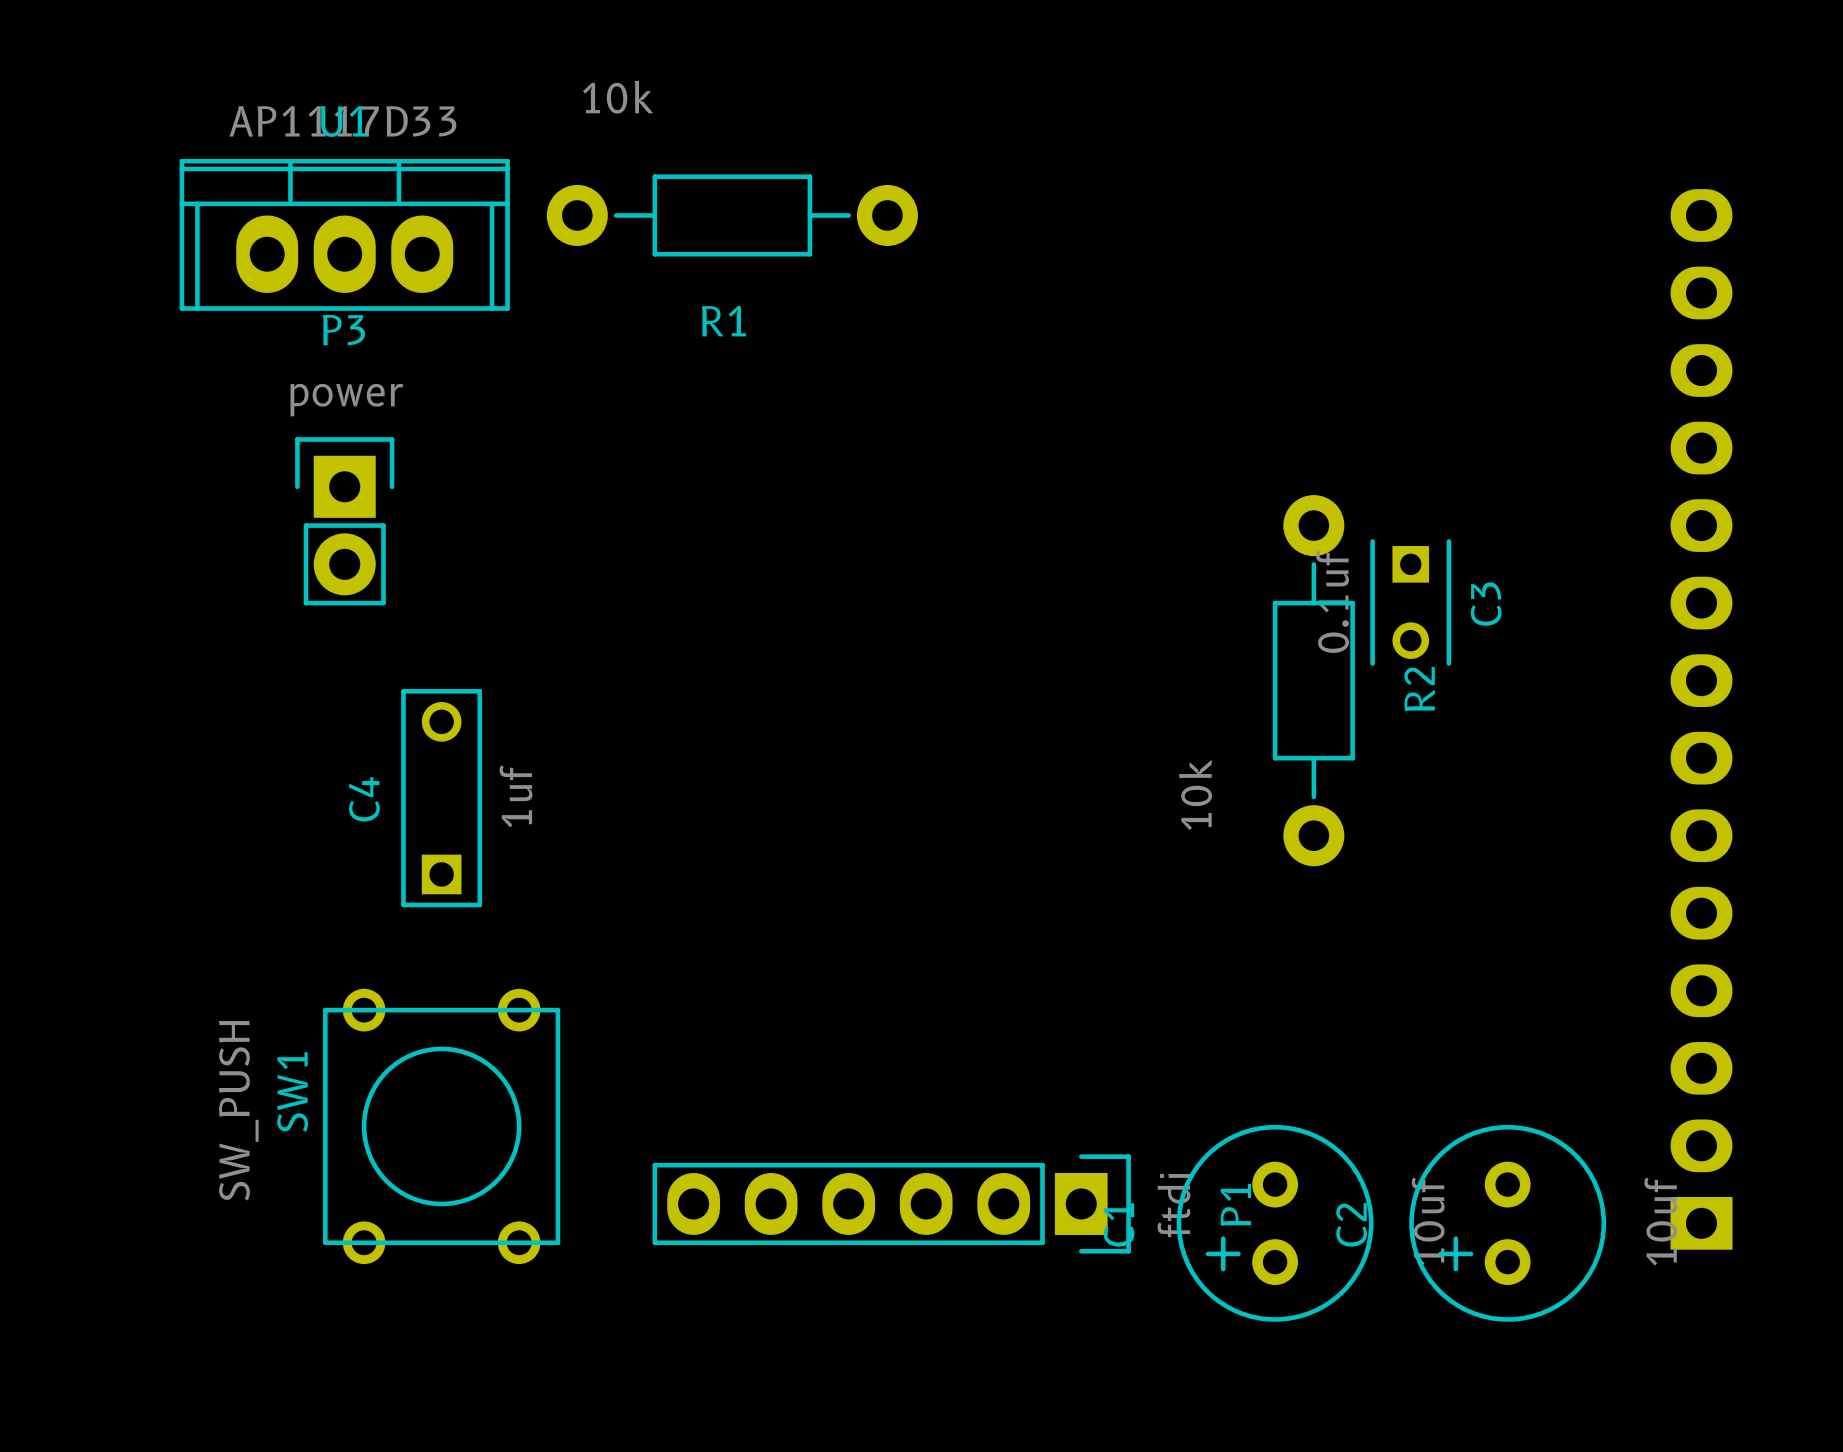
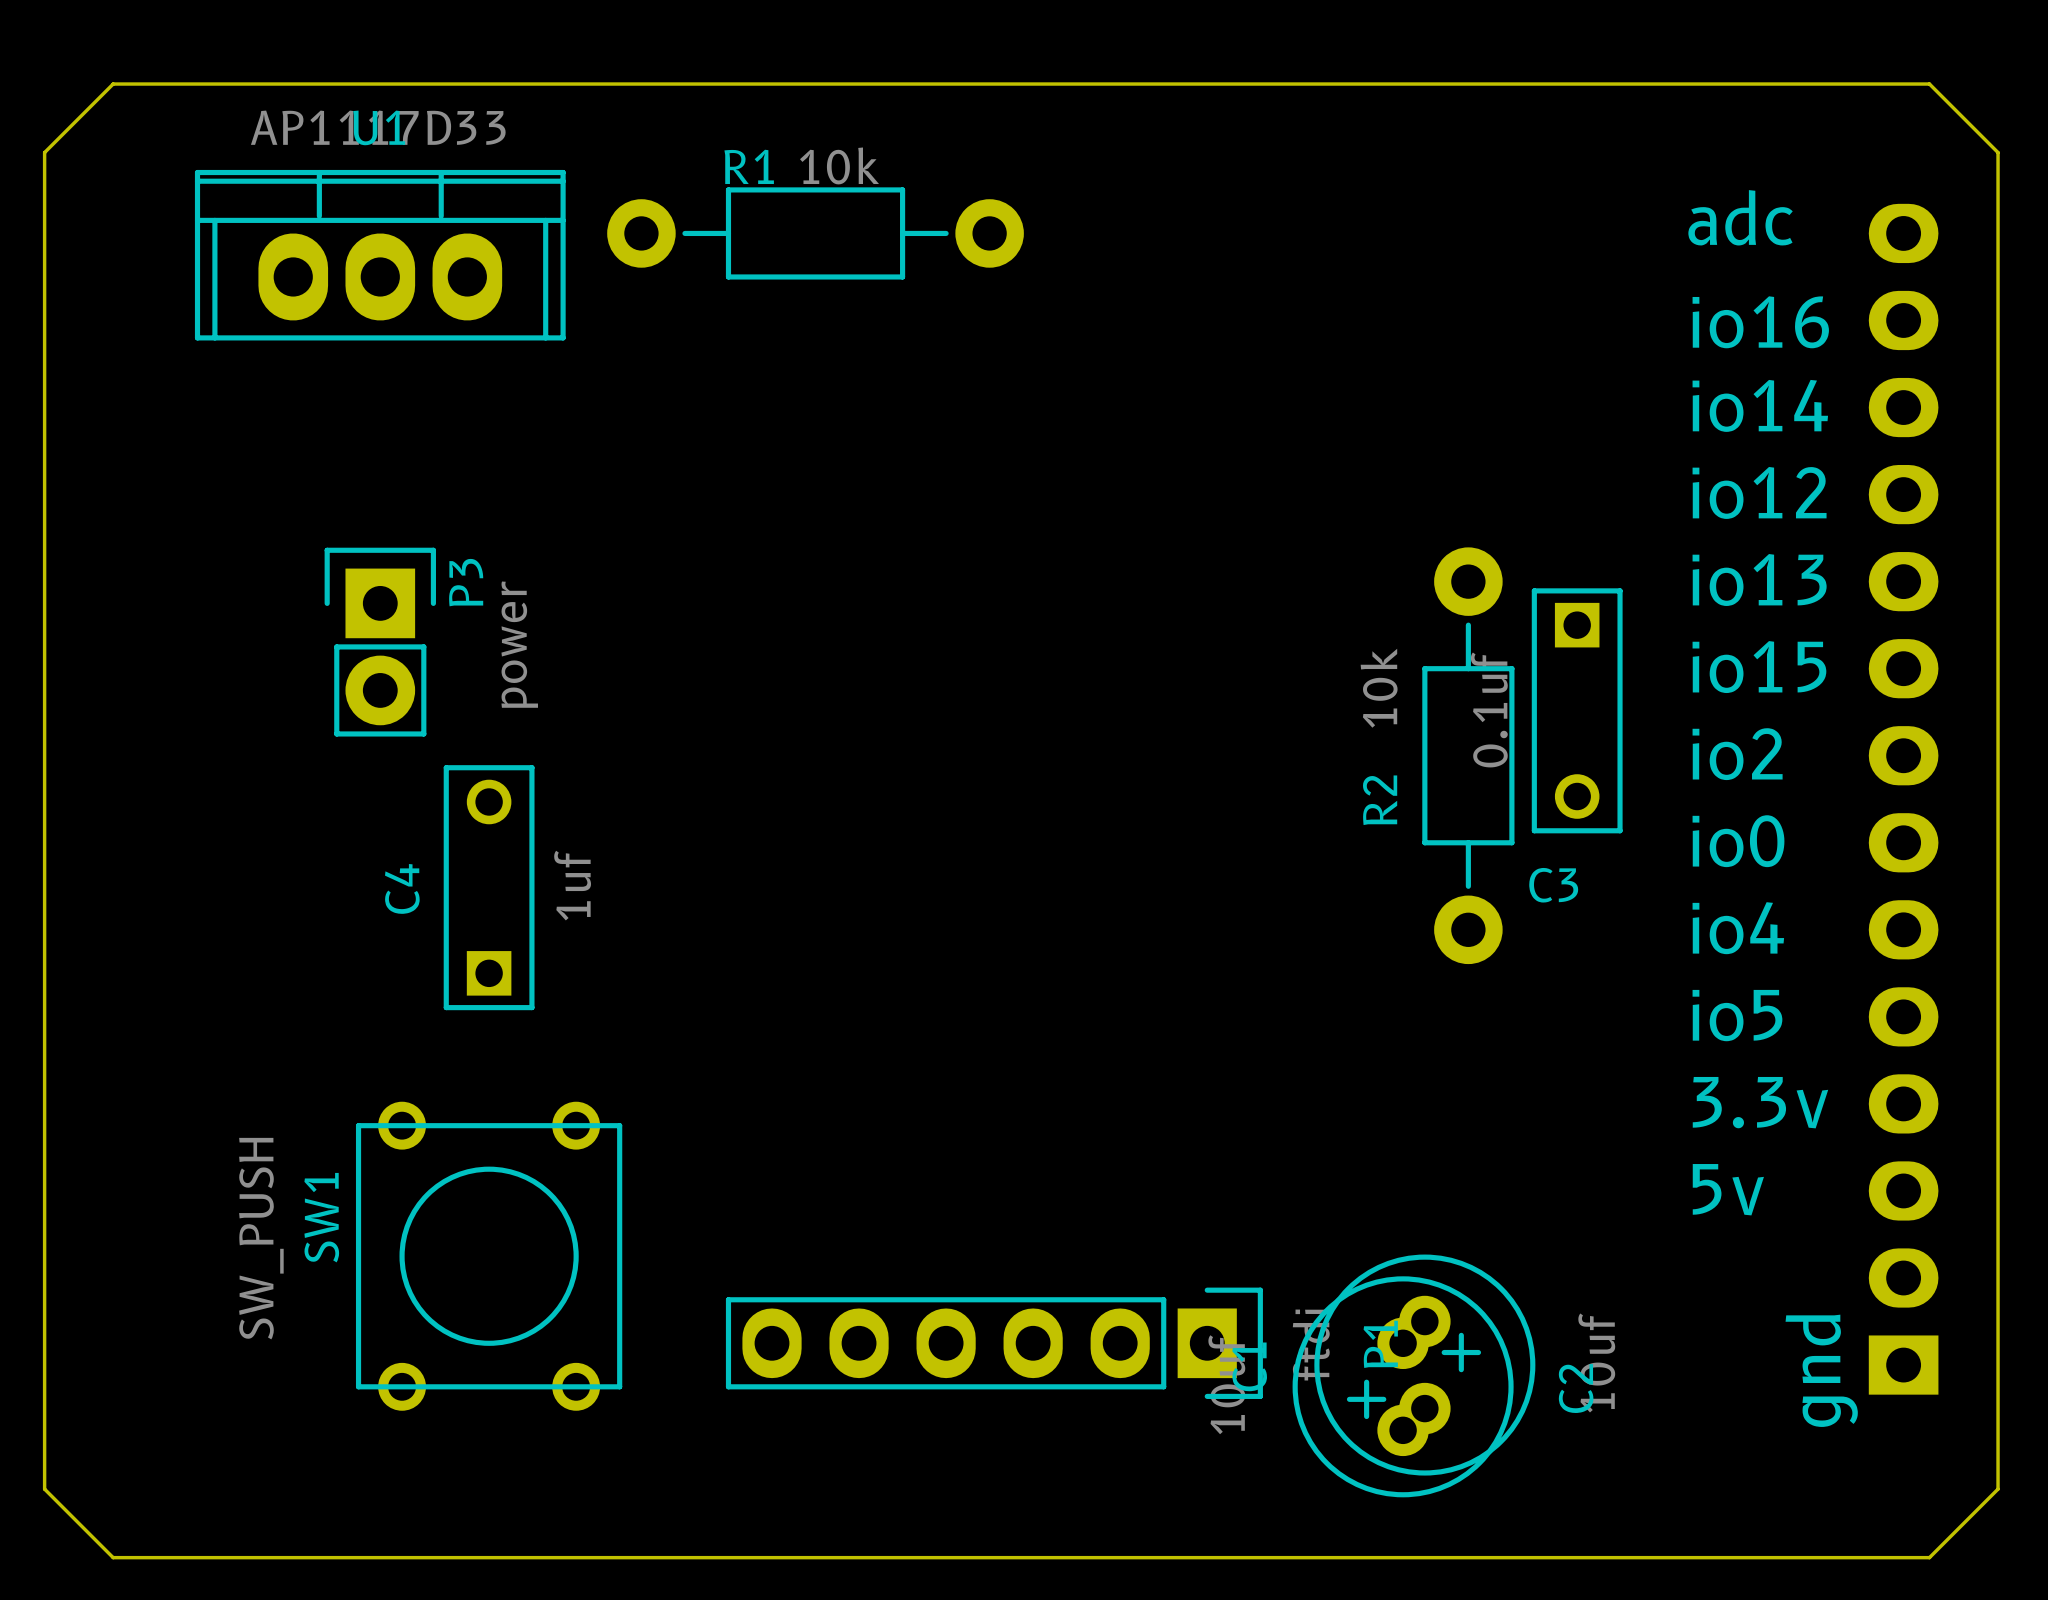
board edge: none -> (113, 84) (1929, 84) (1998, 152) (1998, 1489) (1929, 1557) (113, 1557) (44, 1489) (44, 152) (113, 84)
R1 value position: 10k (618, 97) -> 10k (839, 165)
text: none -> adc (1740, 217)
text: none -> io16 (1760, 322)
R1 name position: R1 (723, 321) -> R1 (749, 166)
P3 name rotation: 0° (343, 330) -> 90° counterclockwise (466, 582)
P3 name position: P3 (343, 330) -> P3 (466, 582)
text: none -> io14 (1760, 405)
P3 value rotation: 0° (346, 400) -> 90° counterclockwise (519, 644)
P3 value position: power (346, 400) -> power (519, 644)
text: none -> io12 (1759, 492)
P3 position: (344, 521) -> (380, 642)
text: none -> io13 (1759, 579)
C3 footprint: [1370, 539, 1452, 666] -> [1531, 588, 1623, 834]
text: none -> io15 (1759, 667)
C3 name position: C3 (1486, 604) -> C3 (1553, 885)
text: none -> io2 (1737, 754)
R2 name position: R2 (1419, 689) -> R2 (1380, 800)
text: none -> io0 (1738, 841)
R2 value position: 10k (1195, 794) -> 10k (1379, 688)
text: none -> io4 (1738, 928)
text: none -> io5 (1737, 1015)
text: none -> 3.3v (1760, 1102)
text: none -> 5v (1728, 1189)
C2 rotation: 0° (1507, 1223) -> 180° (1403, 1386)
C2 position: (1507, 1223) -> (1403, 1386)
text: none -> gnd (1821, 1370)

